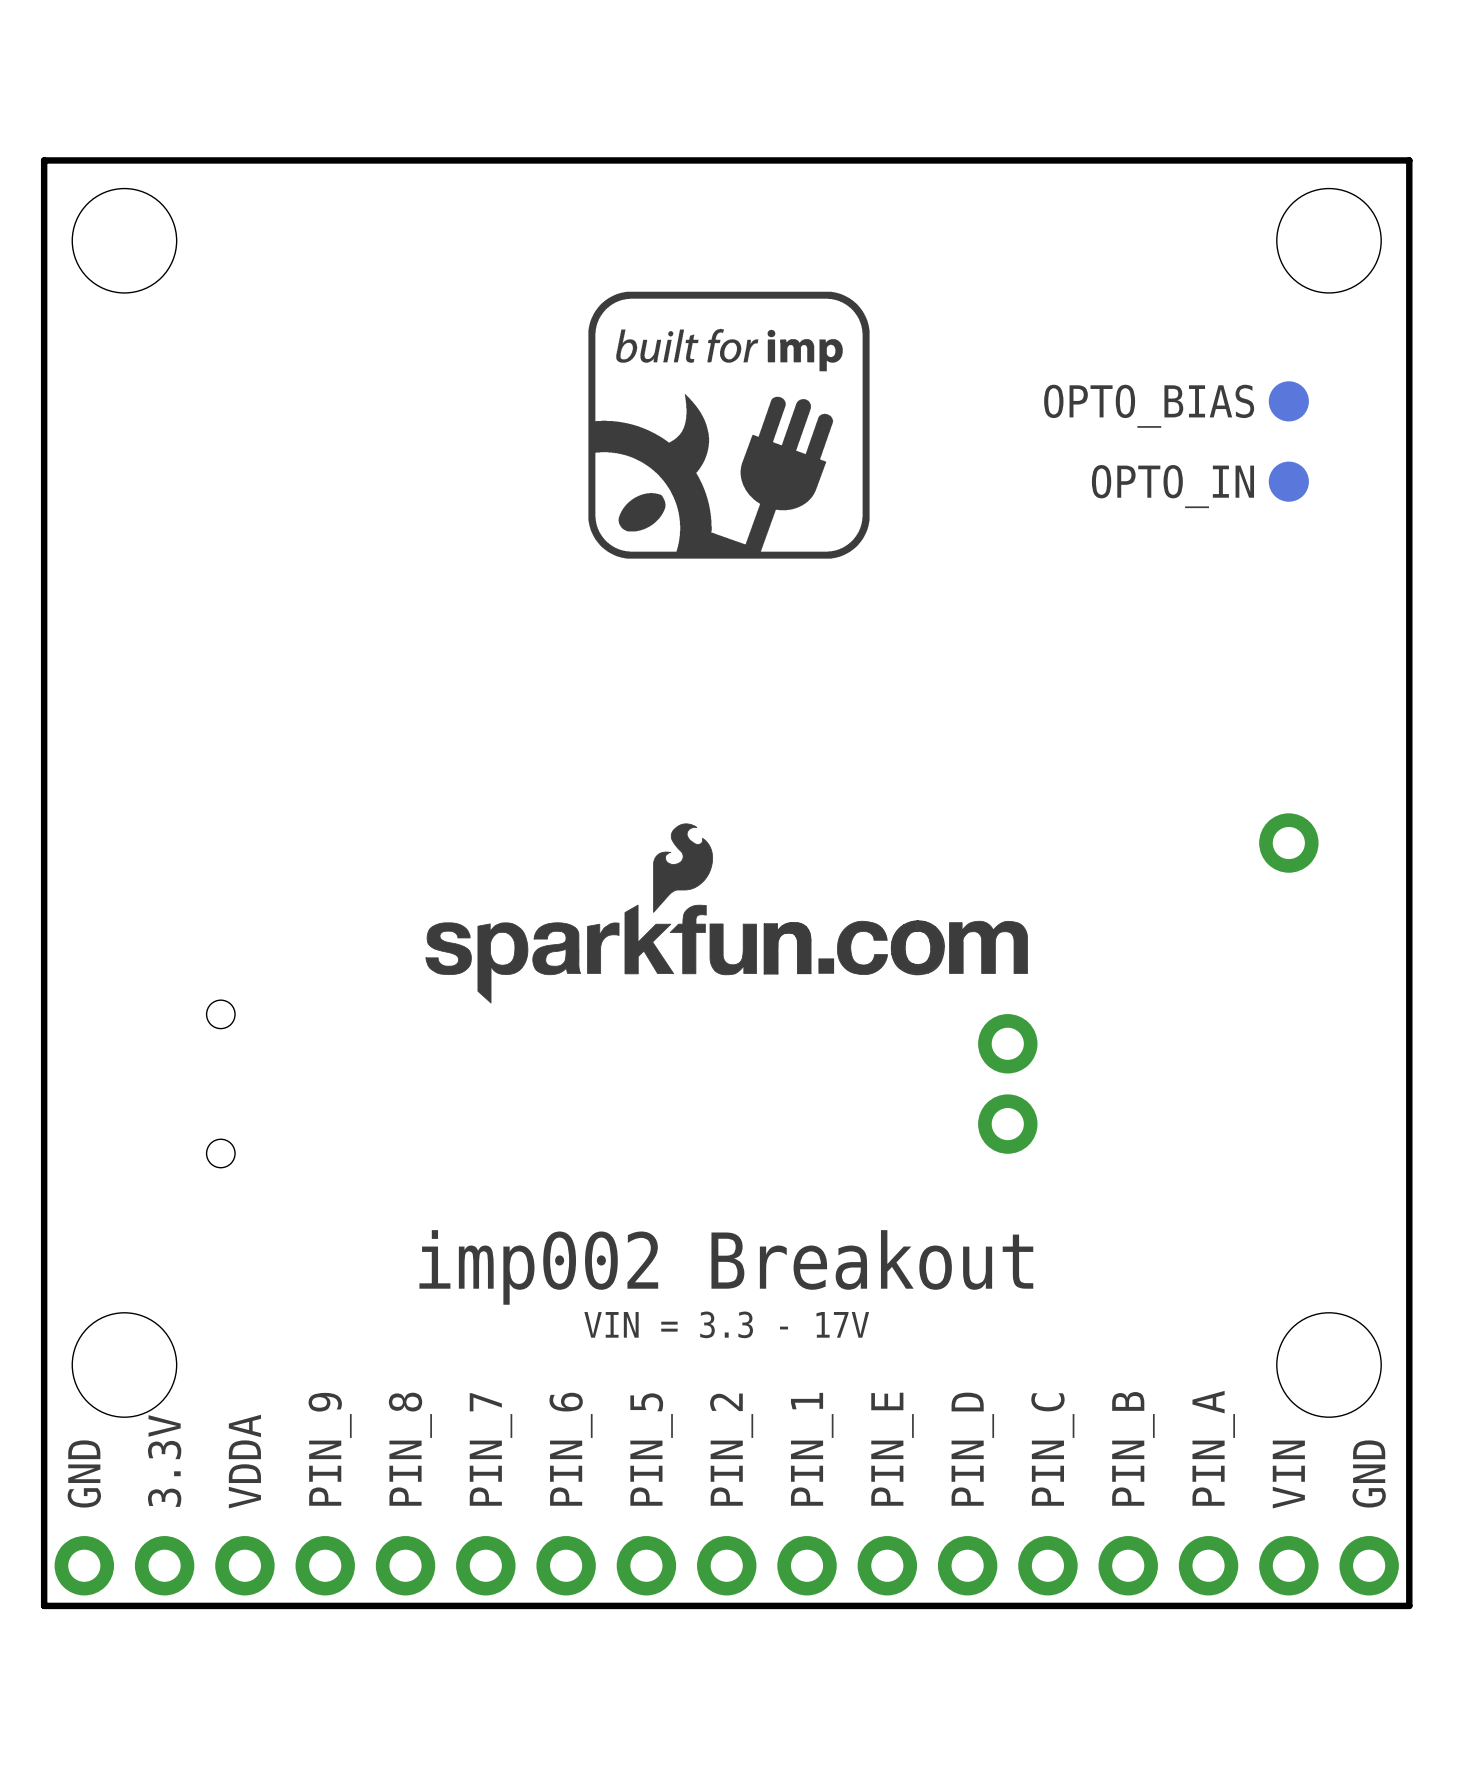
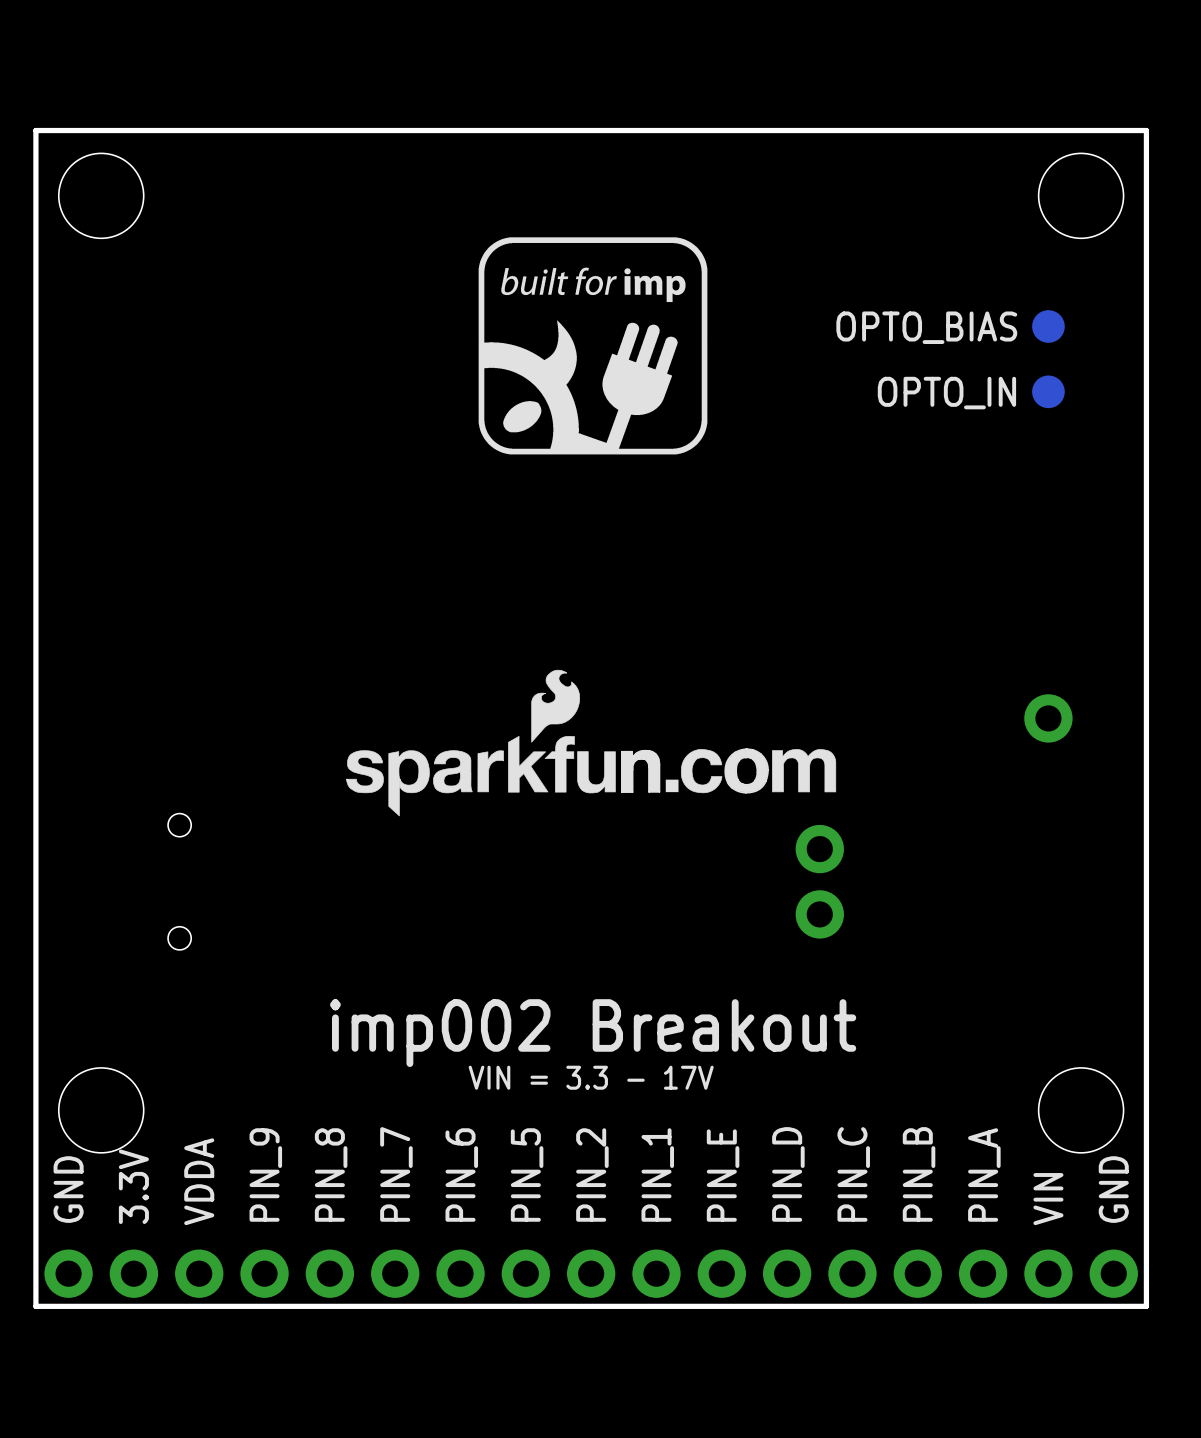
part position: (1288, 843) -> (1048, 718)

